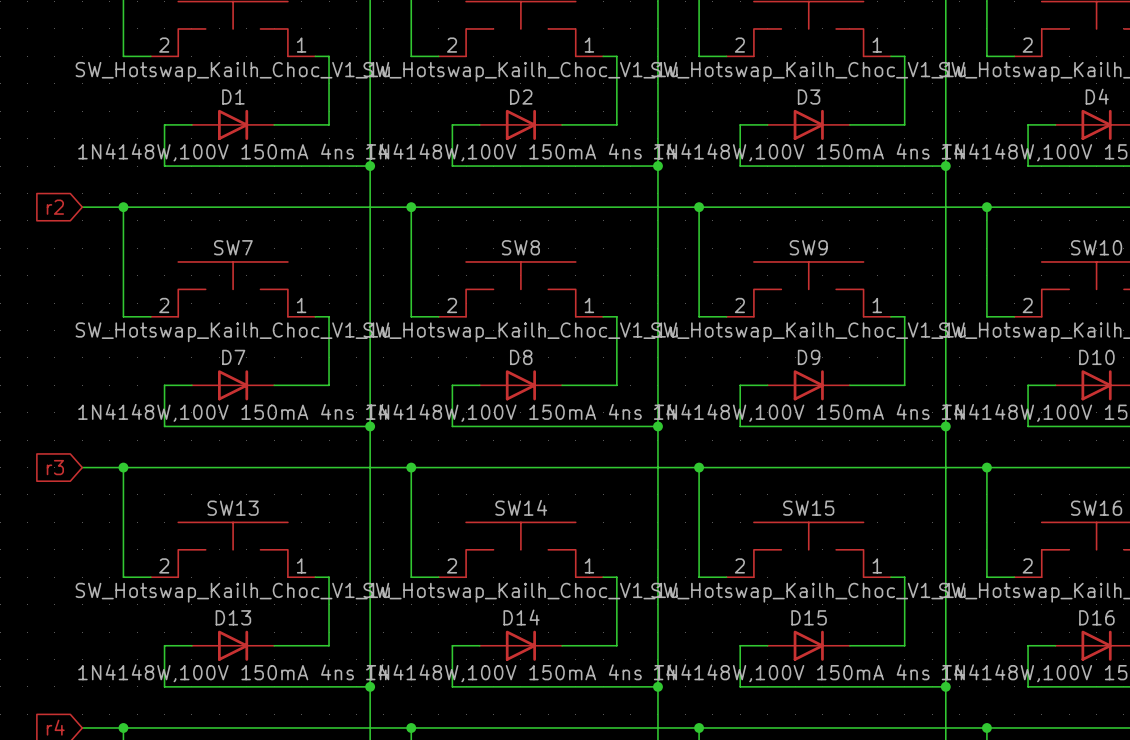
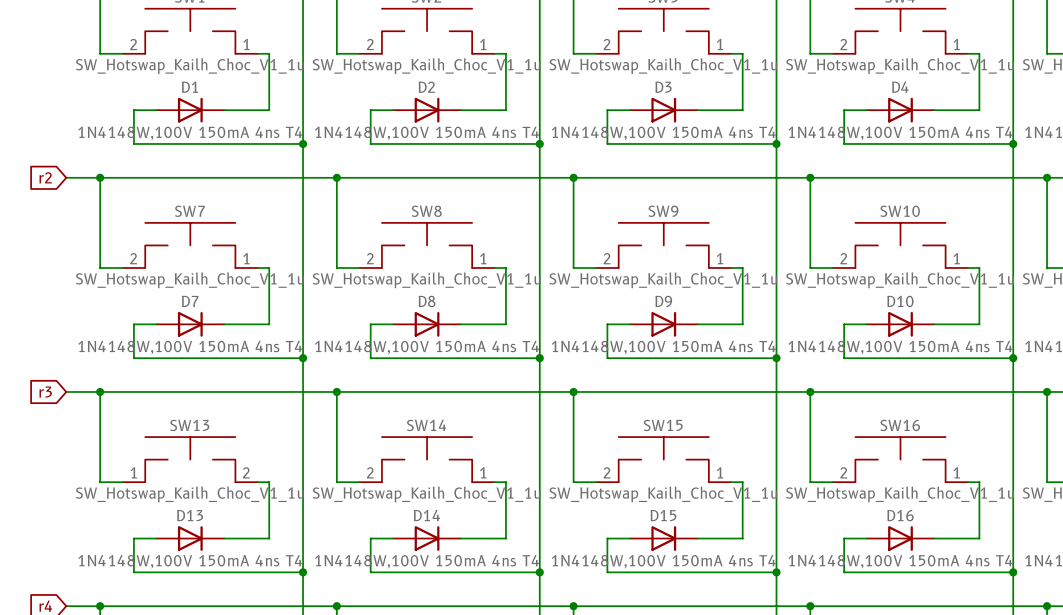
SW13 flip: as is (233, 549) -> left-right (190, 459)

